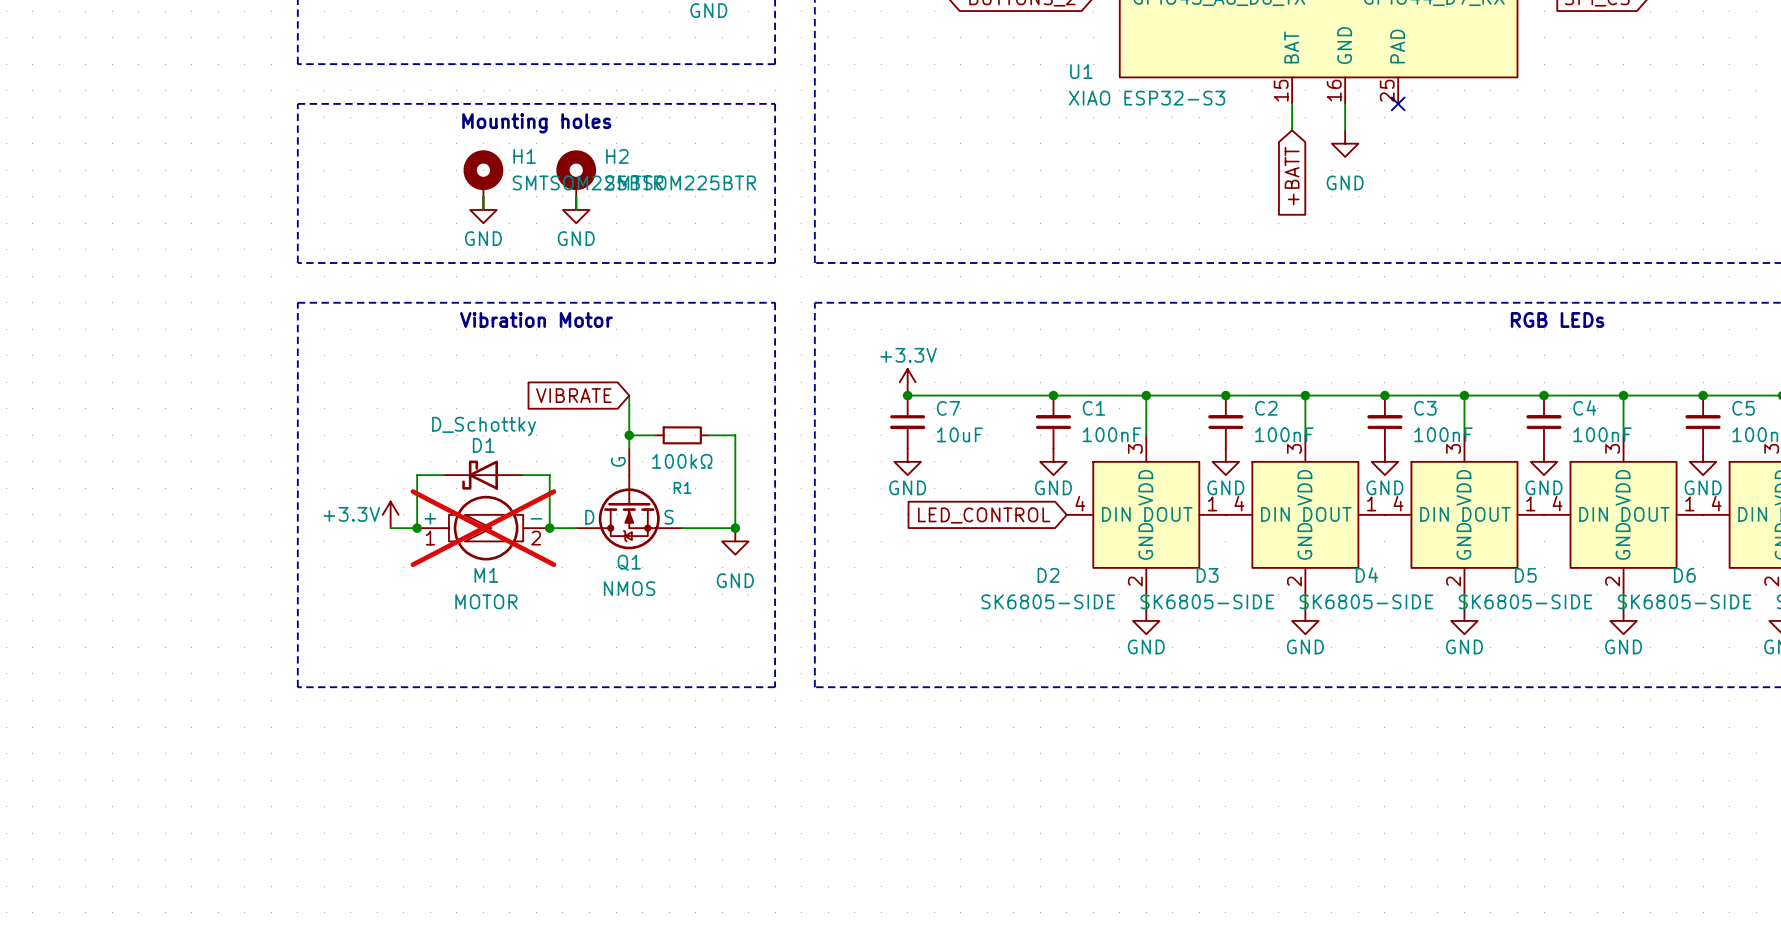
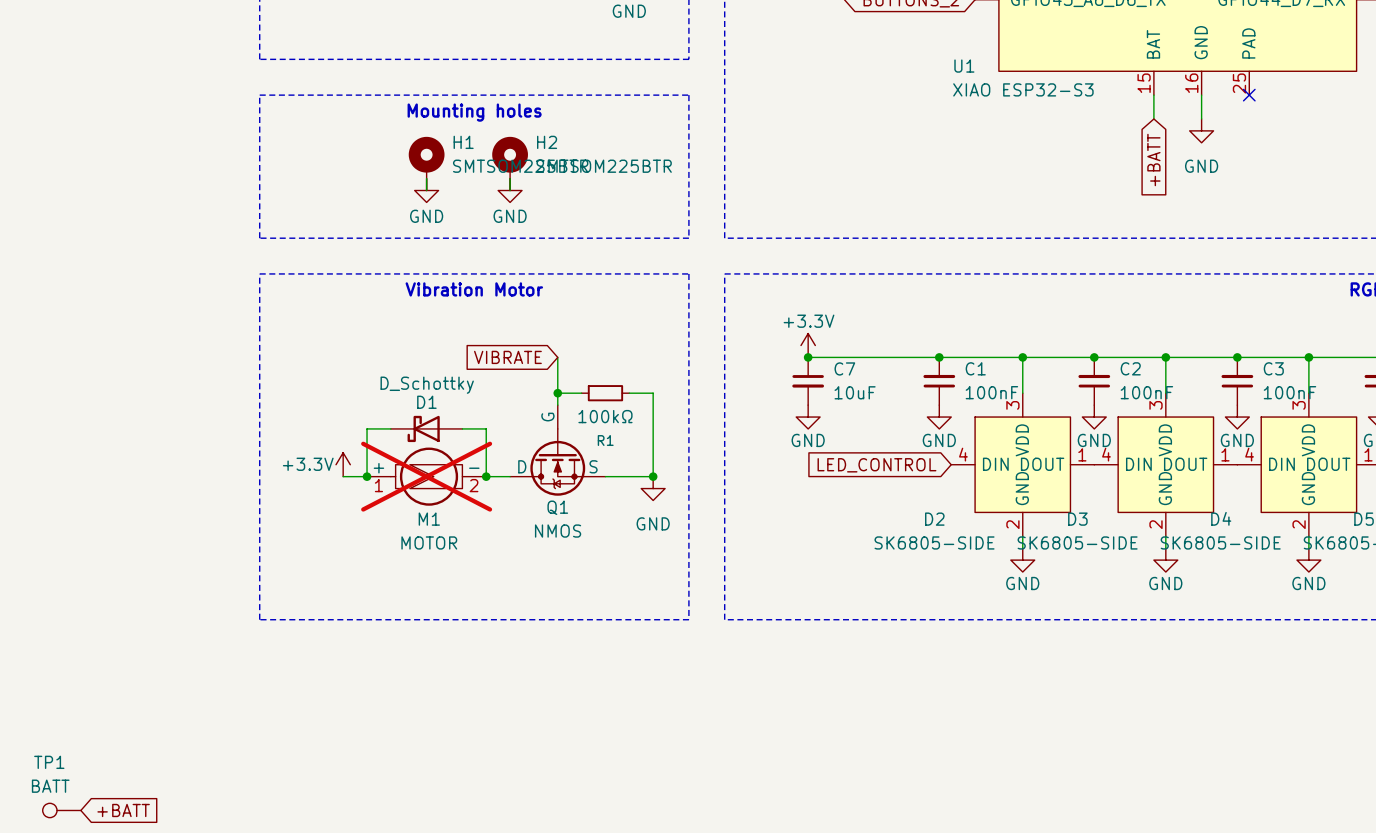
TP1: none -> BATT (61, 810)
global label: none -> +BATT (123, 810)

